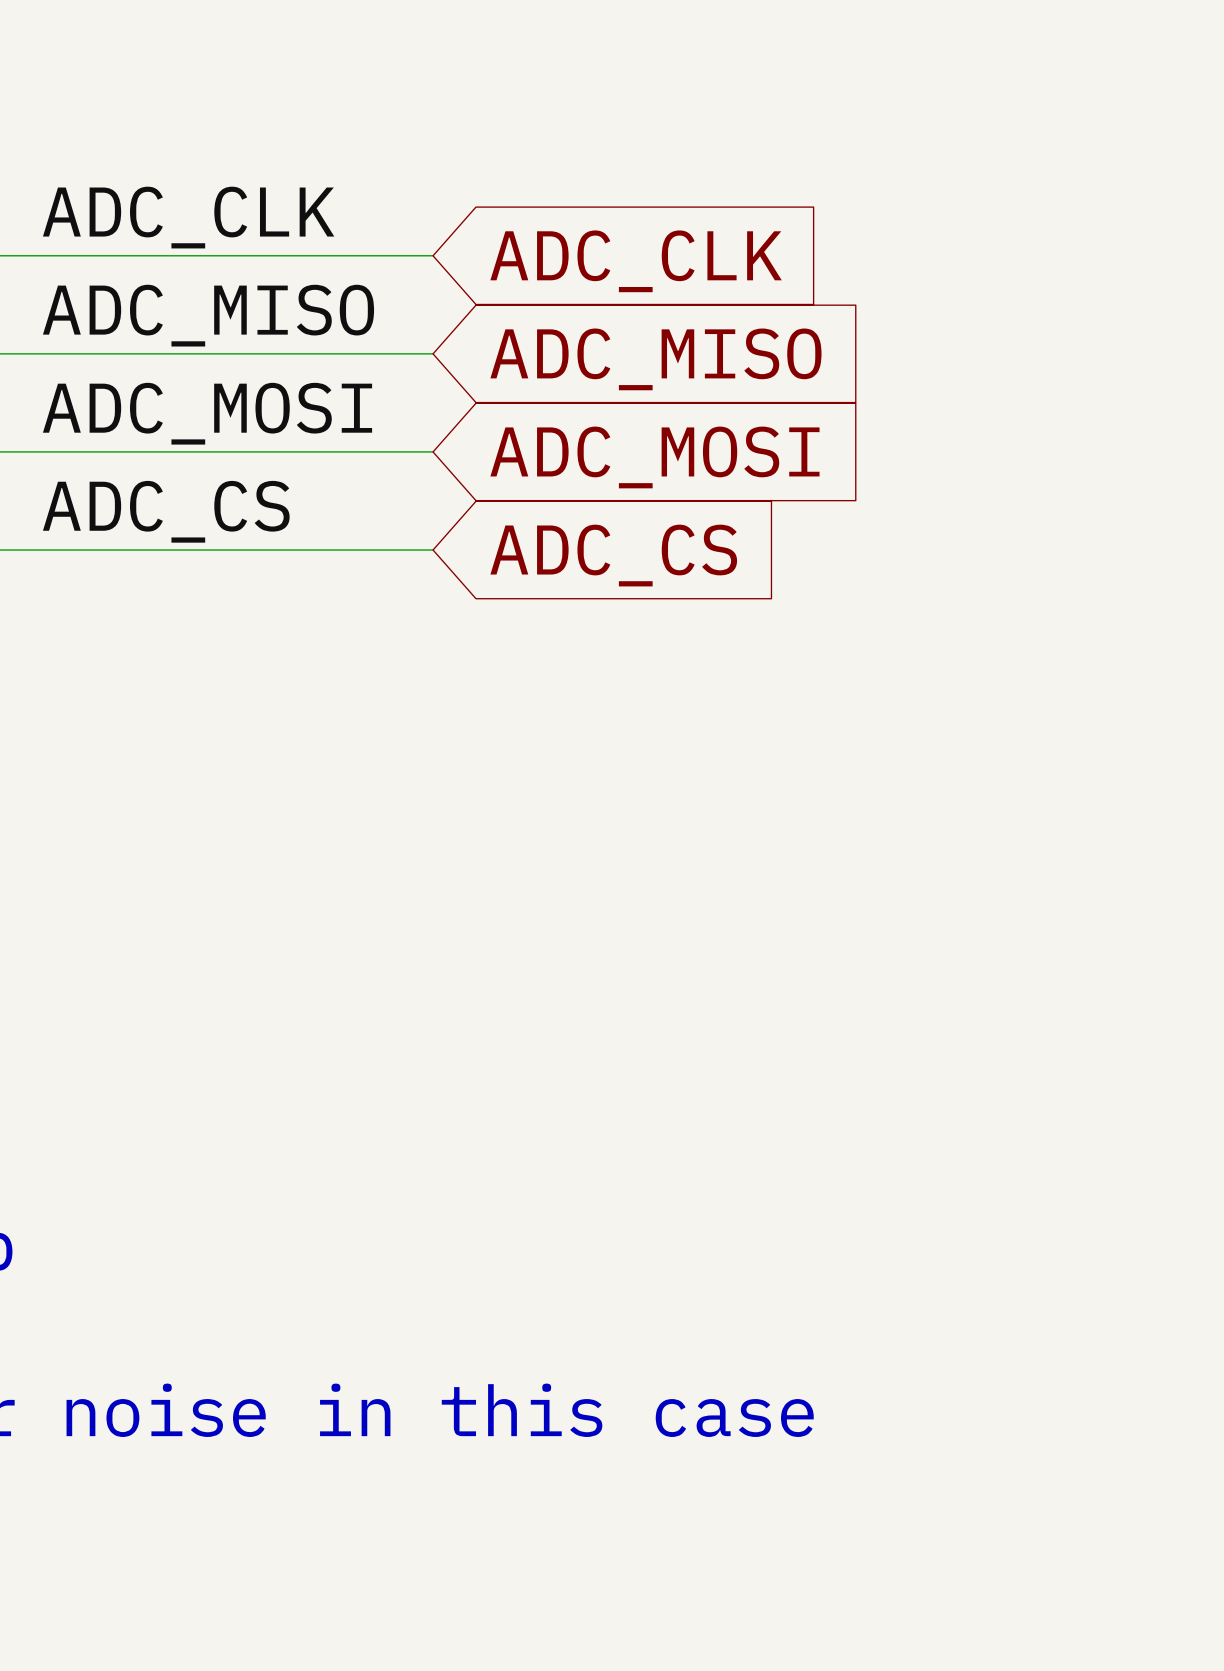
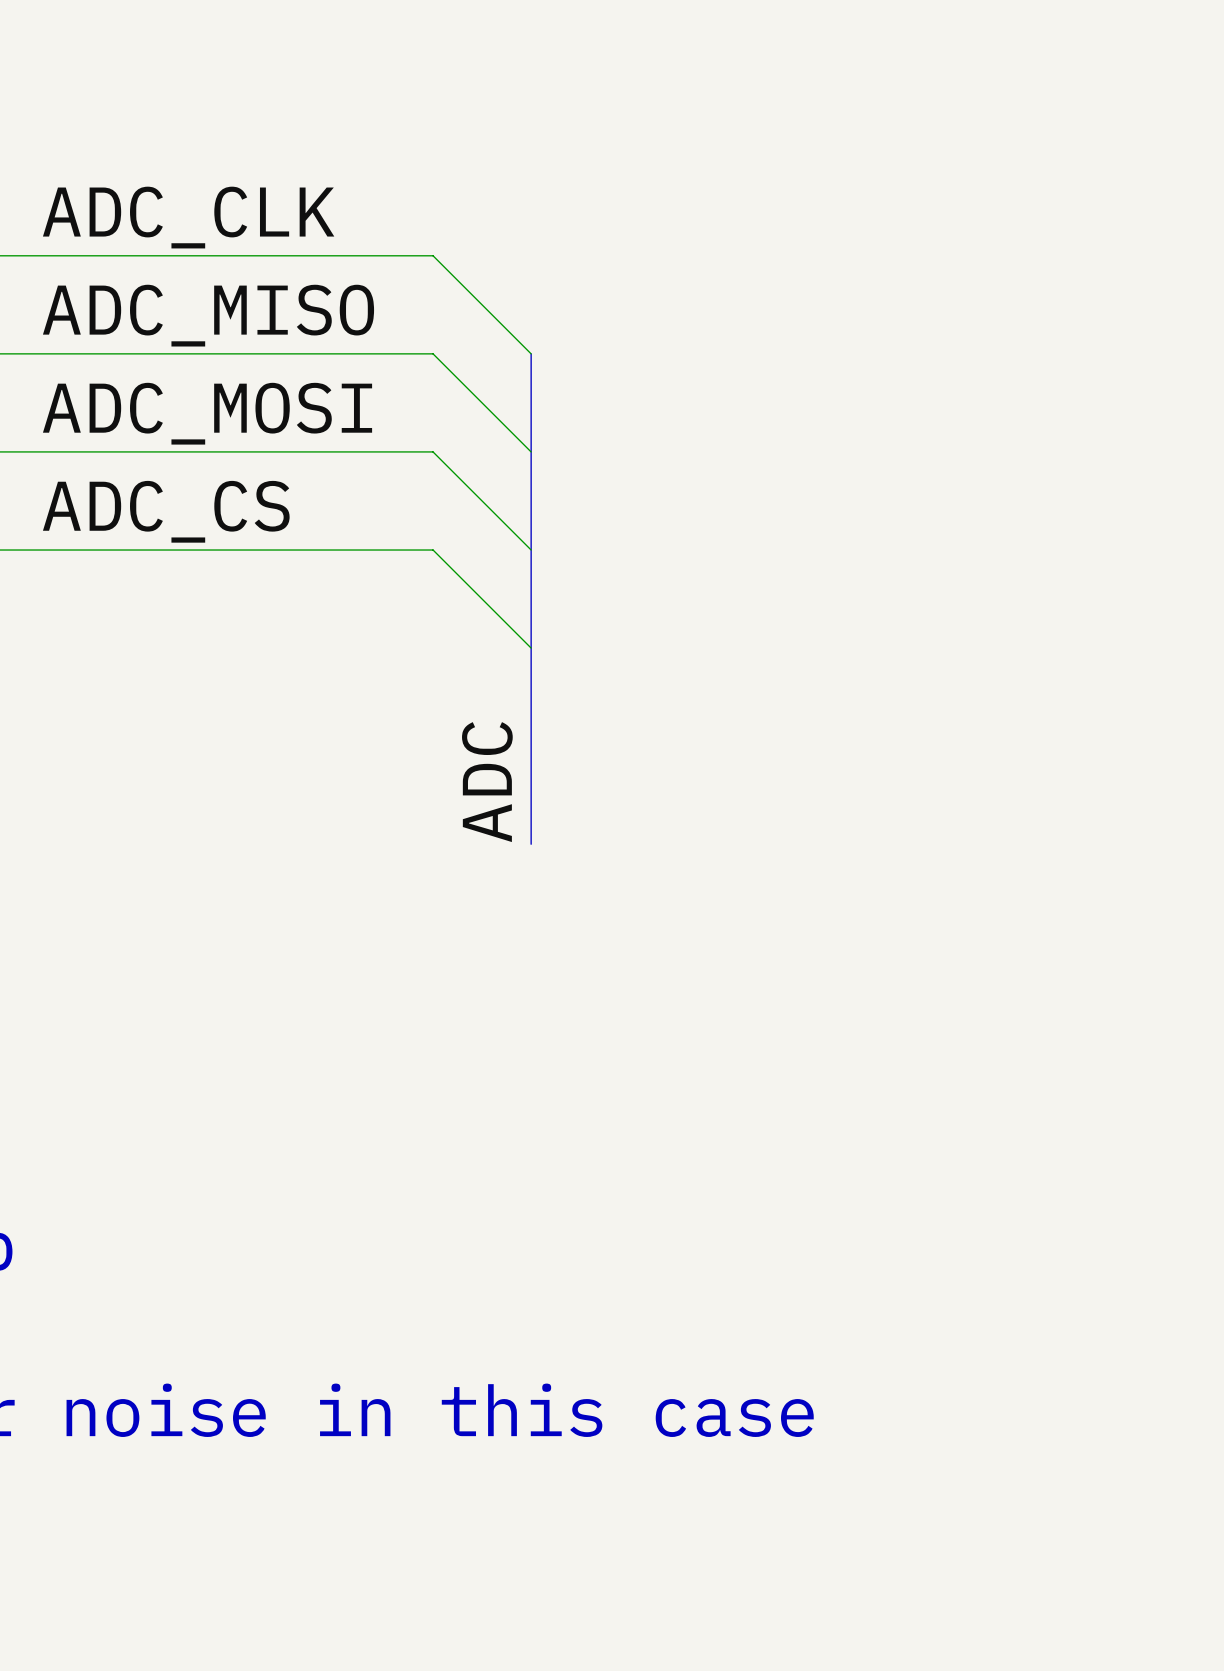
wire: none -> (433, 255) (531, 353)
global label: ADC_CLK (636, 261) -> none
wire: none -> (433, 353) (531, 451)
bus: none -> (531, 353) (531, 844)
global label: ADC_MISO (655, 359) -> none
wire: none -> (433, 451) (531, 550)
global label: ADC_MOSI (654, 457) -> none
wire: none -> (433, 550) (531, 648)
global label: ADC_CS (613, 555) -> none
label: none -> ADC (487, 782)

